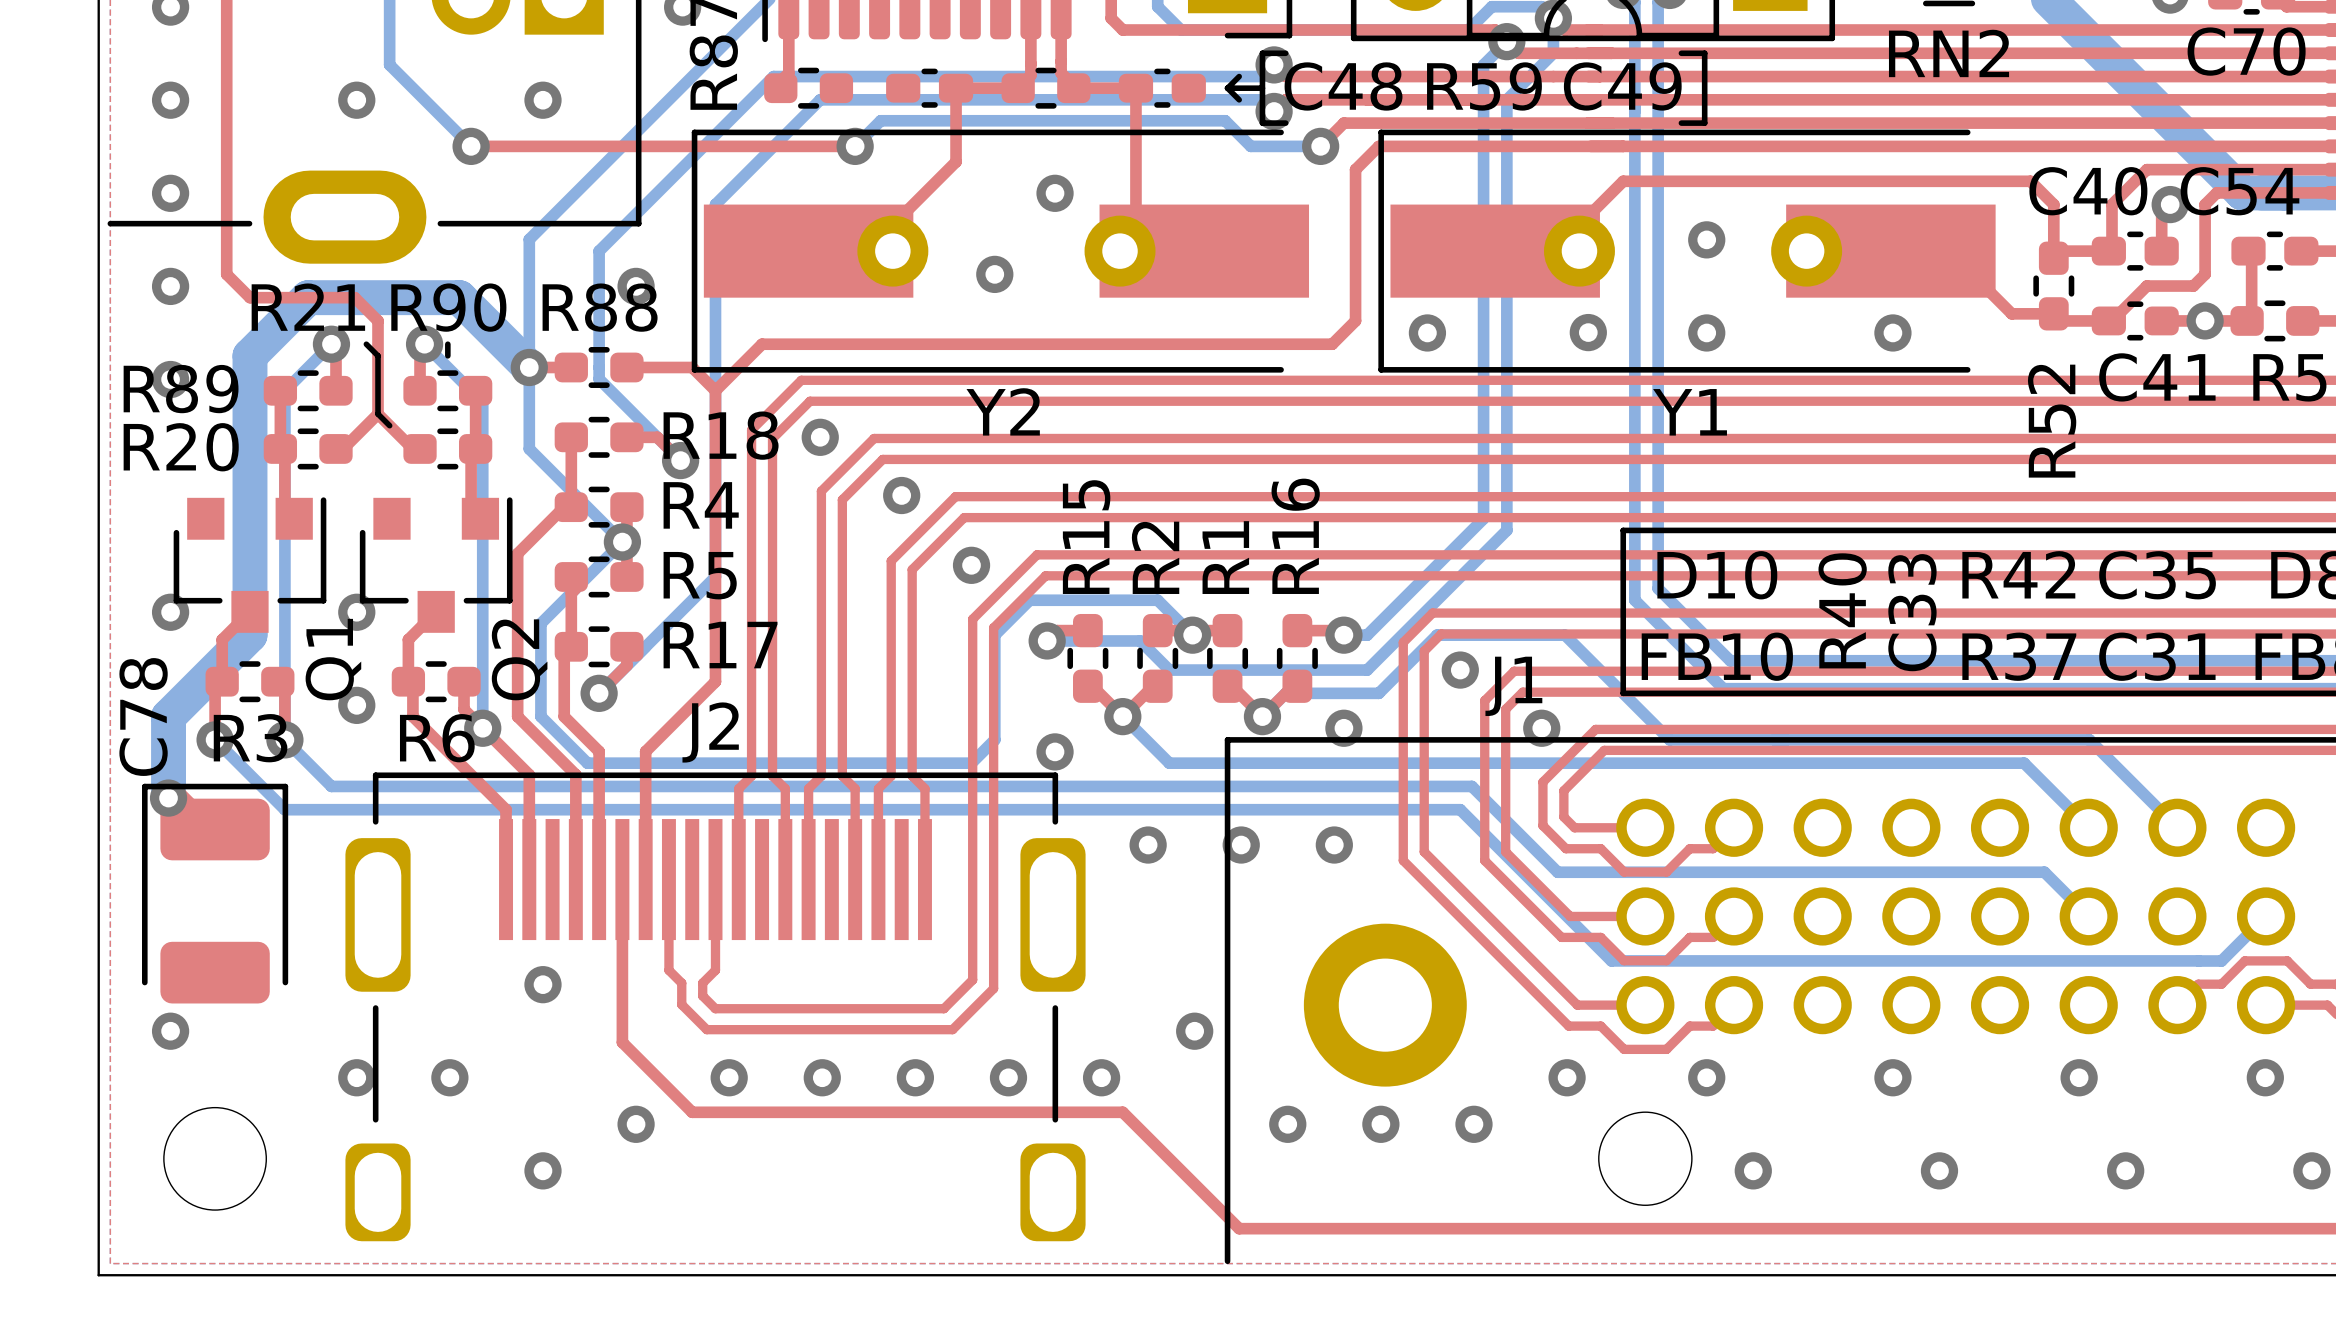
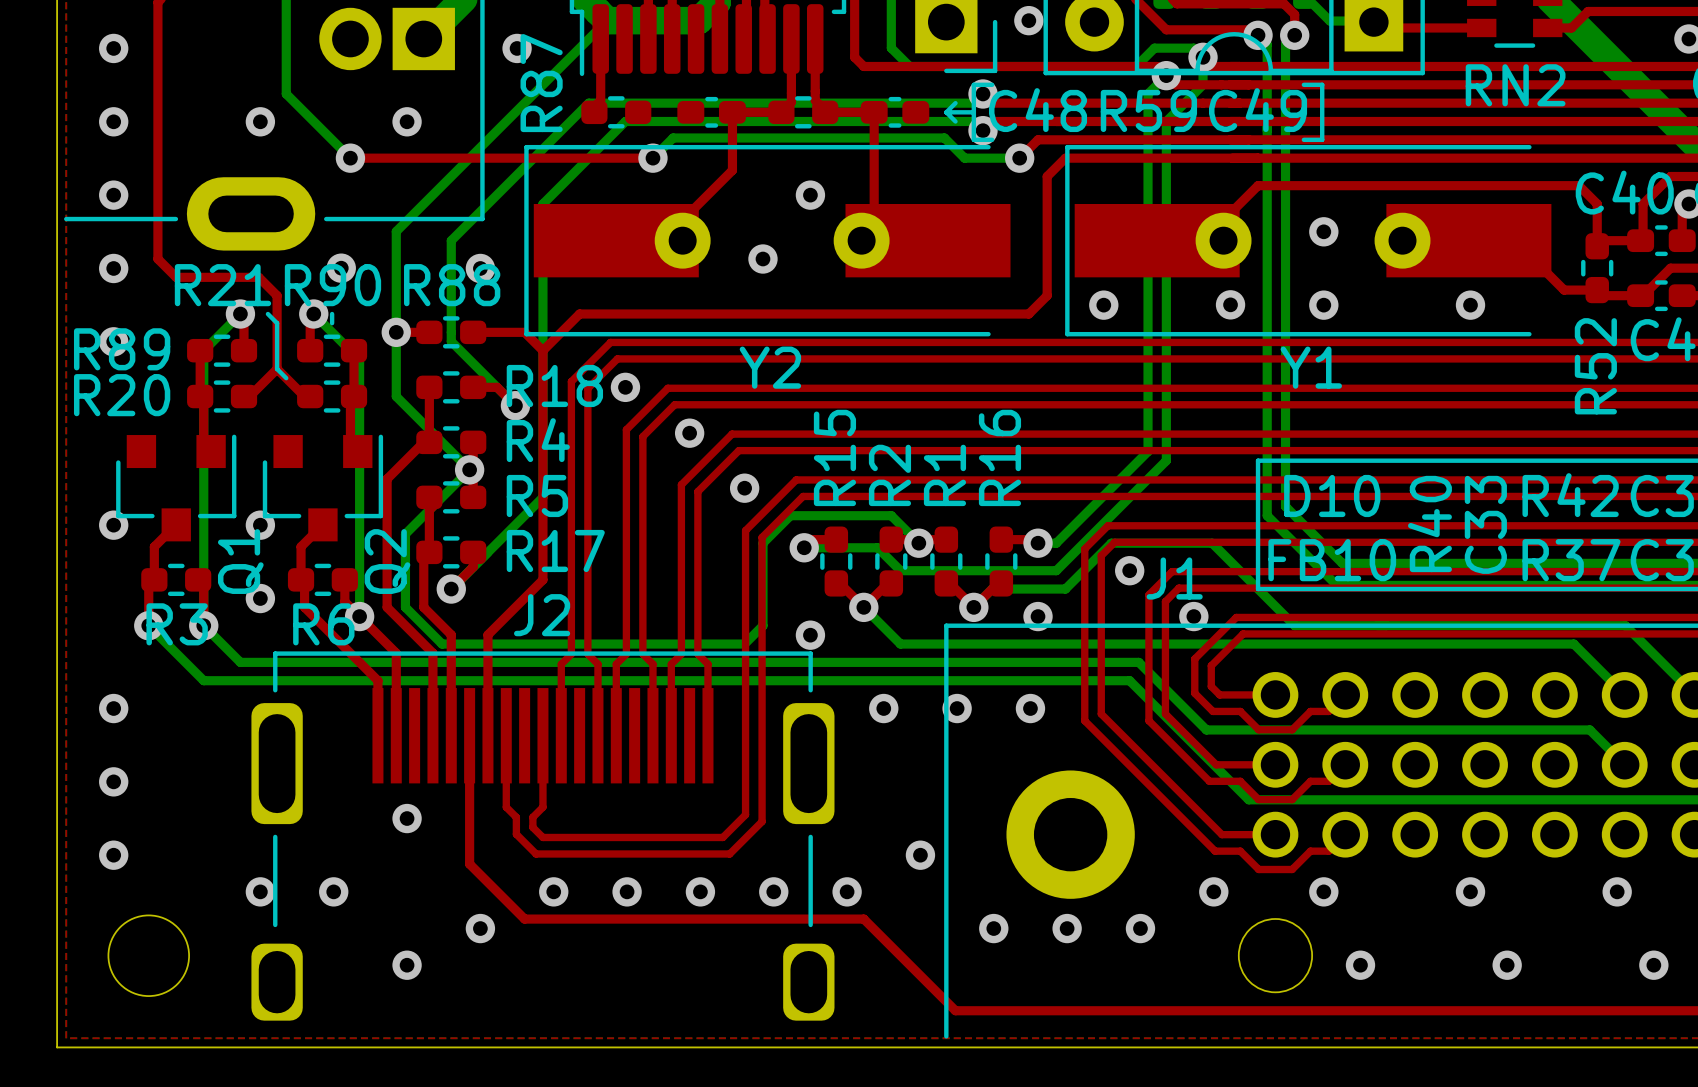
via: none -> (341, 268)
bottom track: (529, 367) (459, 297) (308, 297) (250, 355) (250, 635) (168, 716) (168, 798) -> none
via position: (168, 798) -> (113, 708)
C78: (215, 893) -> none
via: none -> (113, 781)

